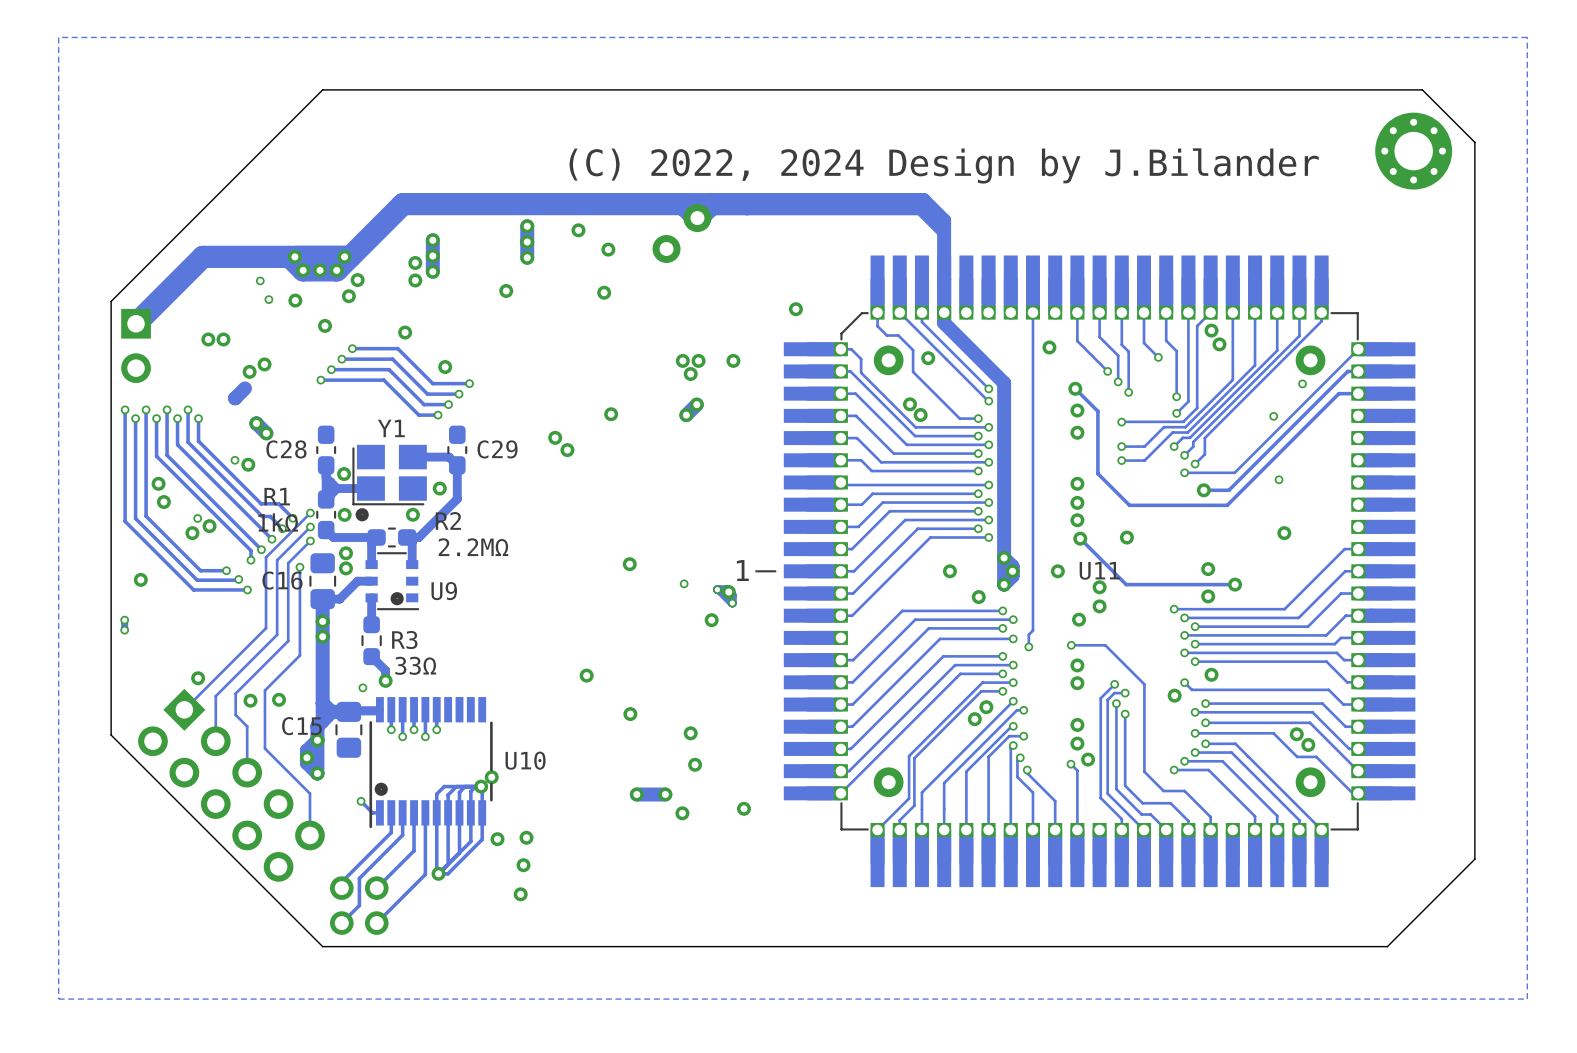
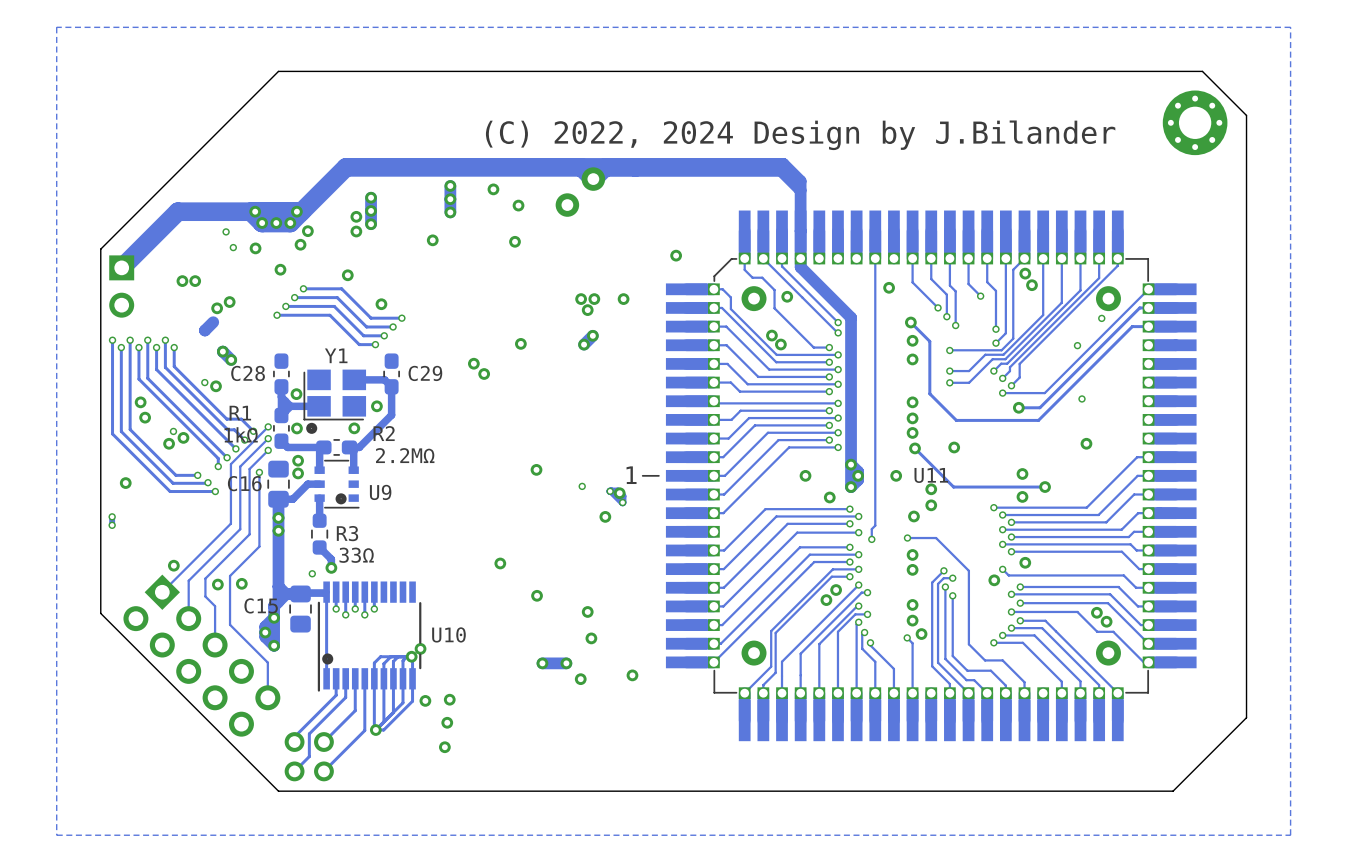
track: (361, 801) (372, 812) (379, 812) -> (326, 592) (326, 678)
via: (361, 801) -> none

